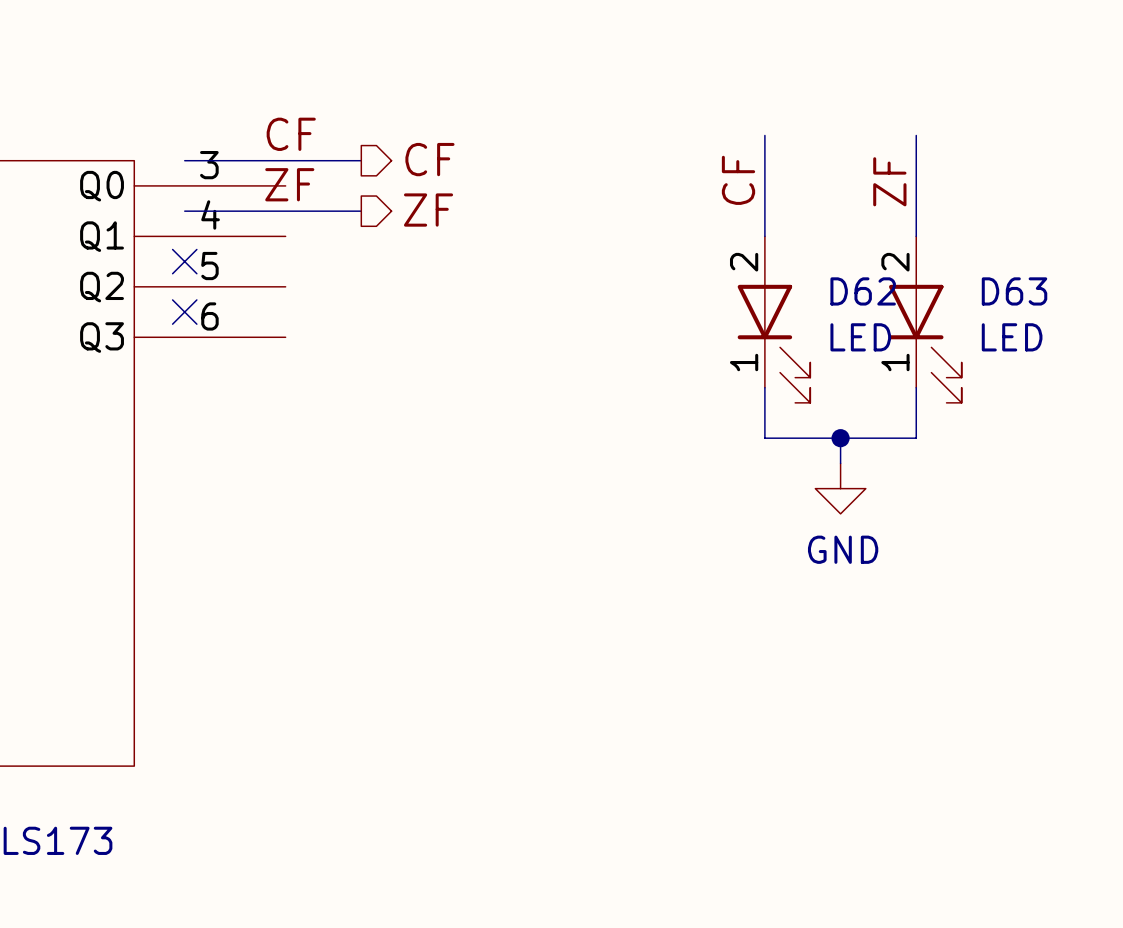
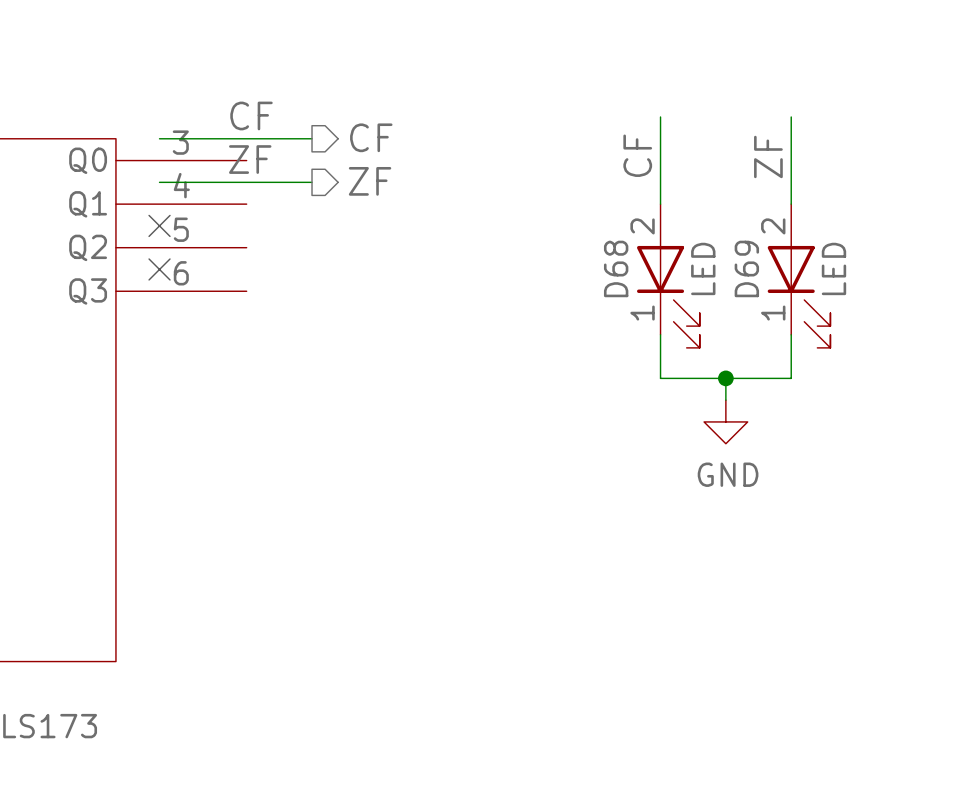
D62 name: D62 (863, 291) -> D68 (616, 268)
D63 name: D63 (1014, 291) -> D69 (746, 268)
D62 value rotation: 0° (860, 337) -> 90° counterclockwise (703, 268)
D63 value rotation: 0° (1012, 337) -> 90° counterclockwise (833, 268)

